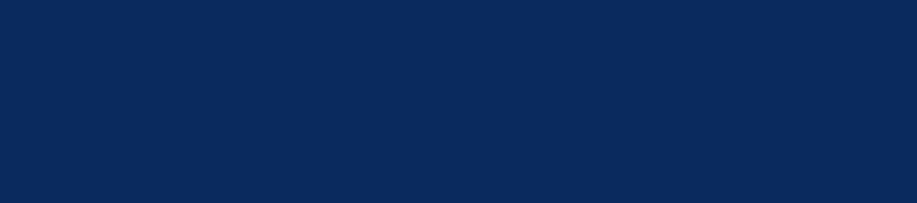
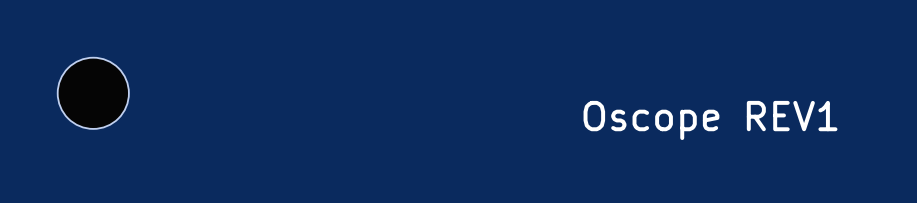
part: none -> (93, 93)
text: none -> Oscope REV1 (710, 120)

